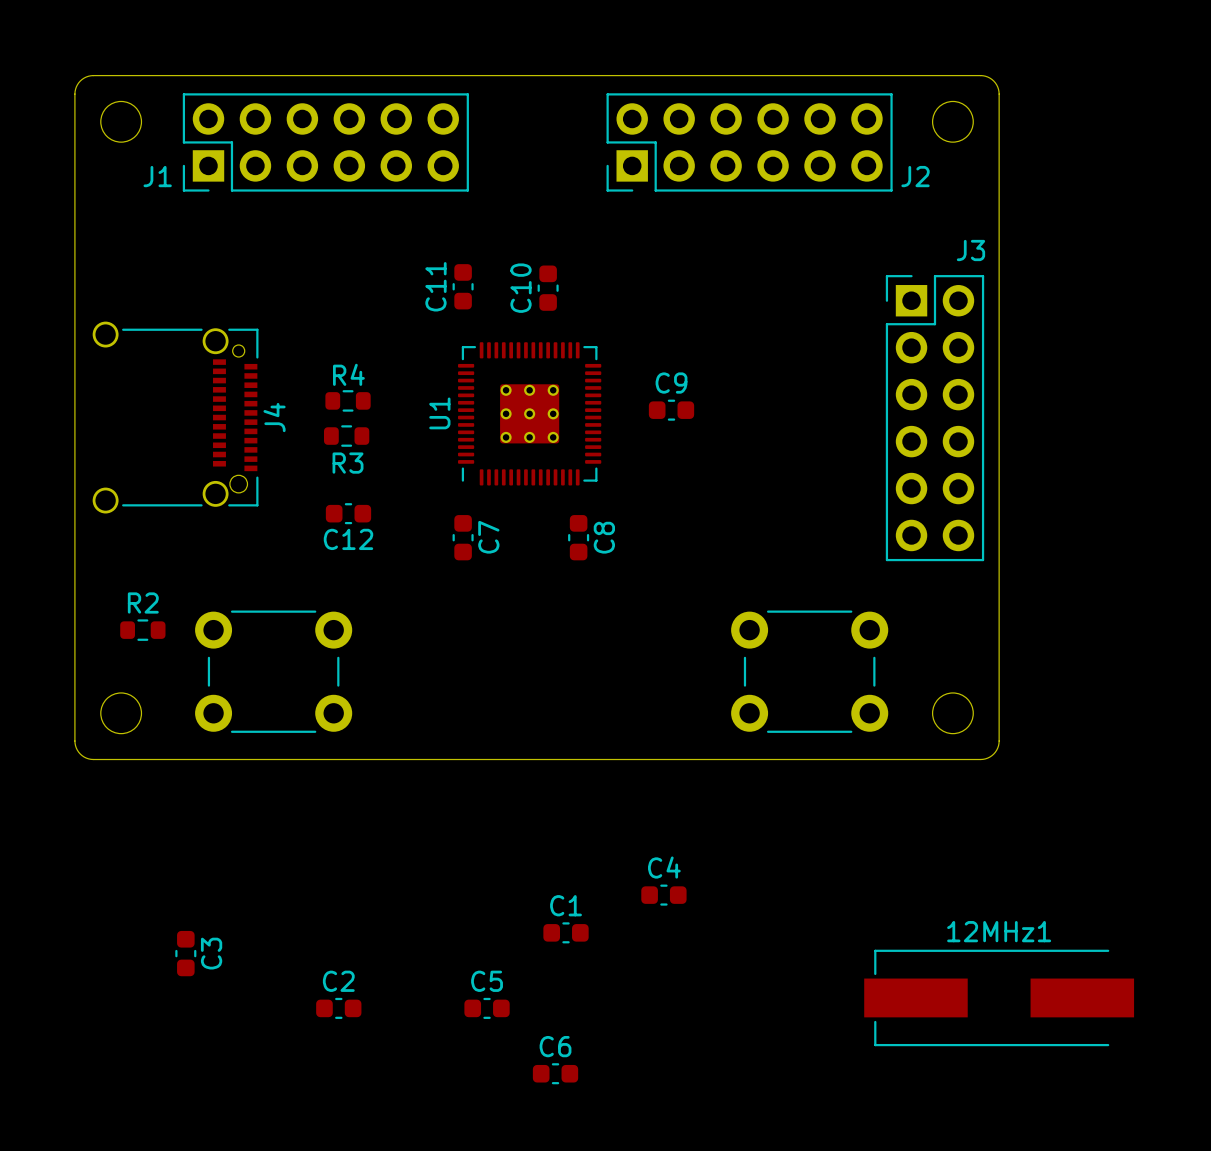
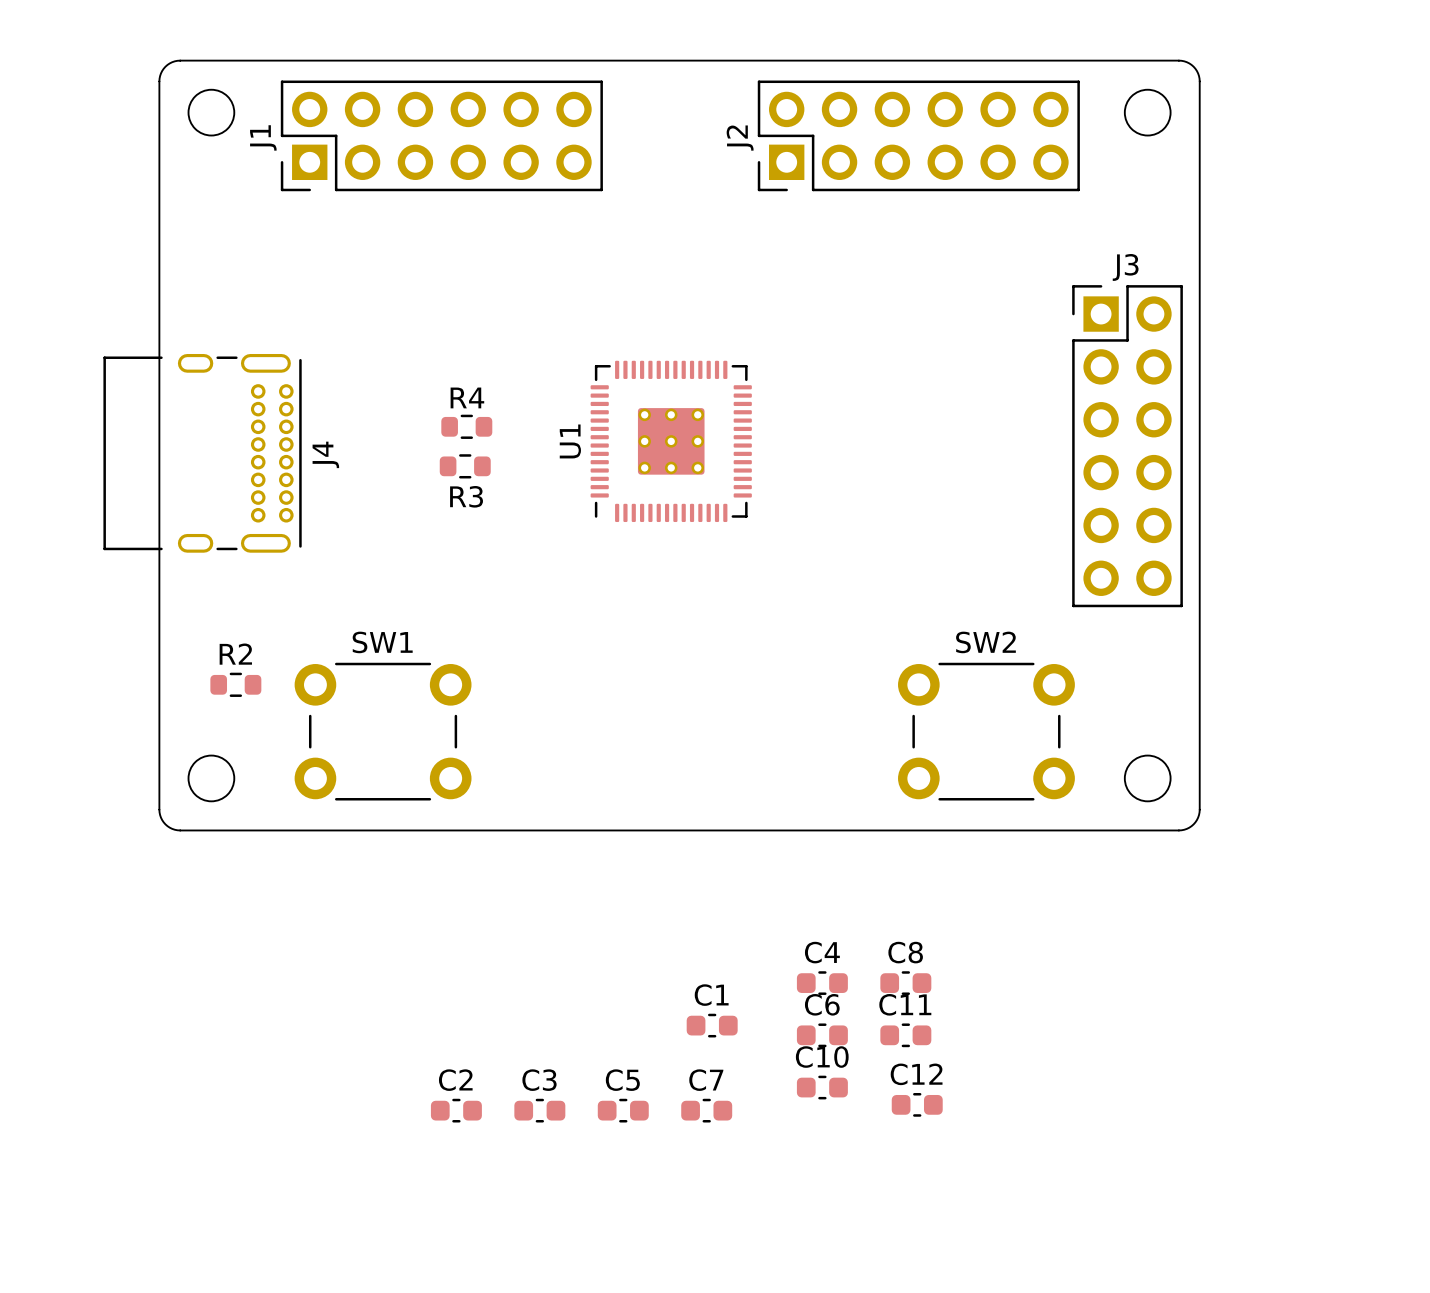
J1 name rotation: 0° (157, 176) -> 90° counterclockwise (263, 137)
J2 name rotation: 0° (915, 176) -> 90° counterclockwise (740, 138)
J2 name position: J2 (915, 176) -> J2 (740, 138)
J3 name position: J3 (970, 250) -> J3 (1125, 267)
C11 rotation: 0° (463, 286) -> 90° clockwise (905, 1035)
C11 position: (463, 286) -> (905, 1035)
C10 rotation: 0° (548, 288) -> 90° clockwise (822, 1087)
C10 position: (548, 288) -> (822, 1087)
J4 footprint: [92, 321, 259, 514] -> [103, 353, 302, 553]
C9: (671, 410) -> none
C12 position: (348, 513) -> (917, 1104)
C7 rotation: 0° (463, 537) -> 90° clockwise (706, 1110)
C7 position: (463, 537) -> (706, 1110)
C7 name position: C7 (488, 537) -> C7 (706, 1080)
C8 rotation: 0° (578, 537) -> 90° clockwise (905, 983)
C8 position: (578, 537) -> (905, 983)
C8 name position: C8 (604, 537) -> C8 (905, 952)
C12 name position: C12 (348, 539) -> C12 (916, 1074)
SW1 name: none -> SW1 (382, 642)
SW2 name: none -> SW2 (985, 642)
C3 rotation: 0° (185, 953) -> 90° clockwise (539, 1110)
C3 position: (185, 953) -> (539, 1110)
C3 name position: C3 (211, 953) -> C3 (539, 1080)
12MHz1: (999, 997) -> none
C6 position: (555, 1073) -> (822, 1035)

